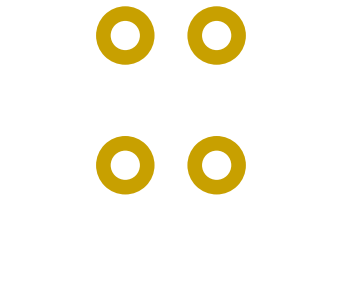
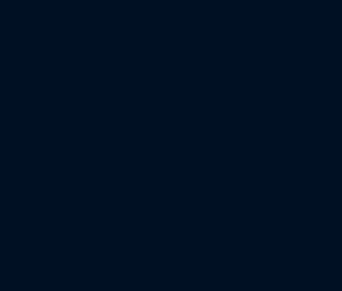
part: (170, 35) -> none
part: (170, 165) -> none

